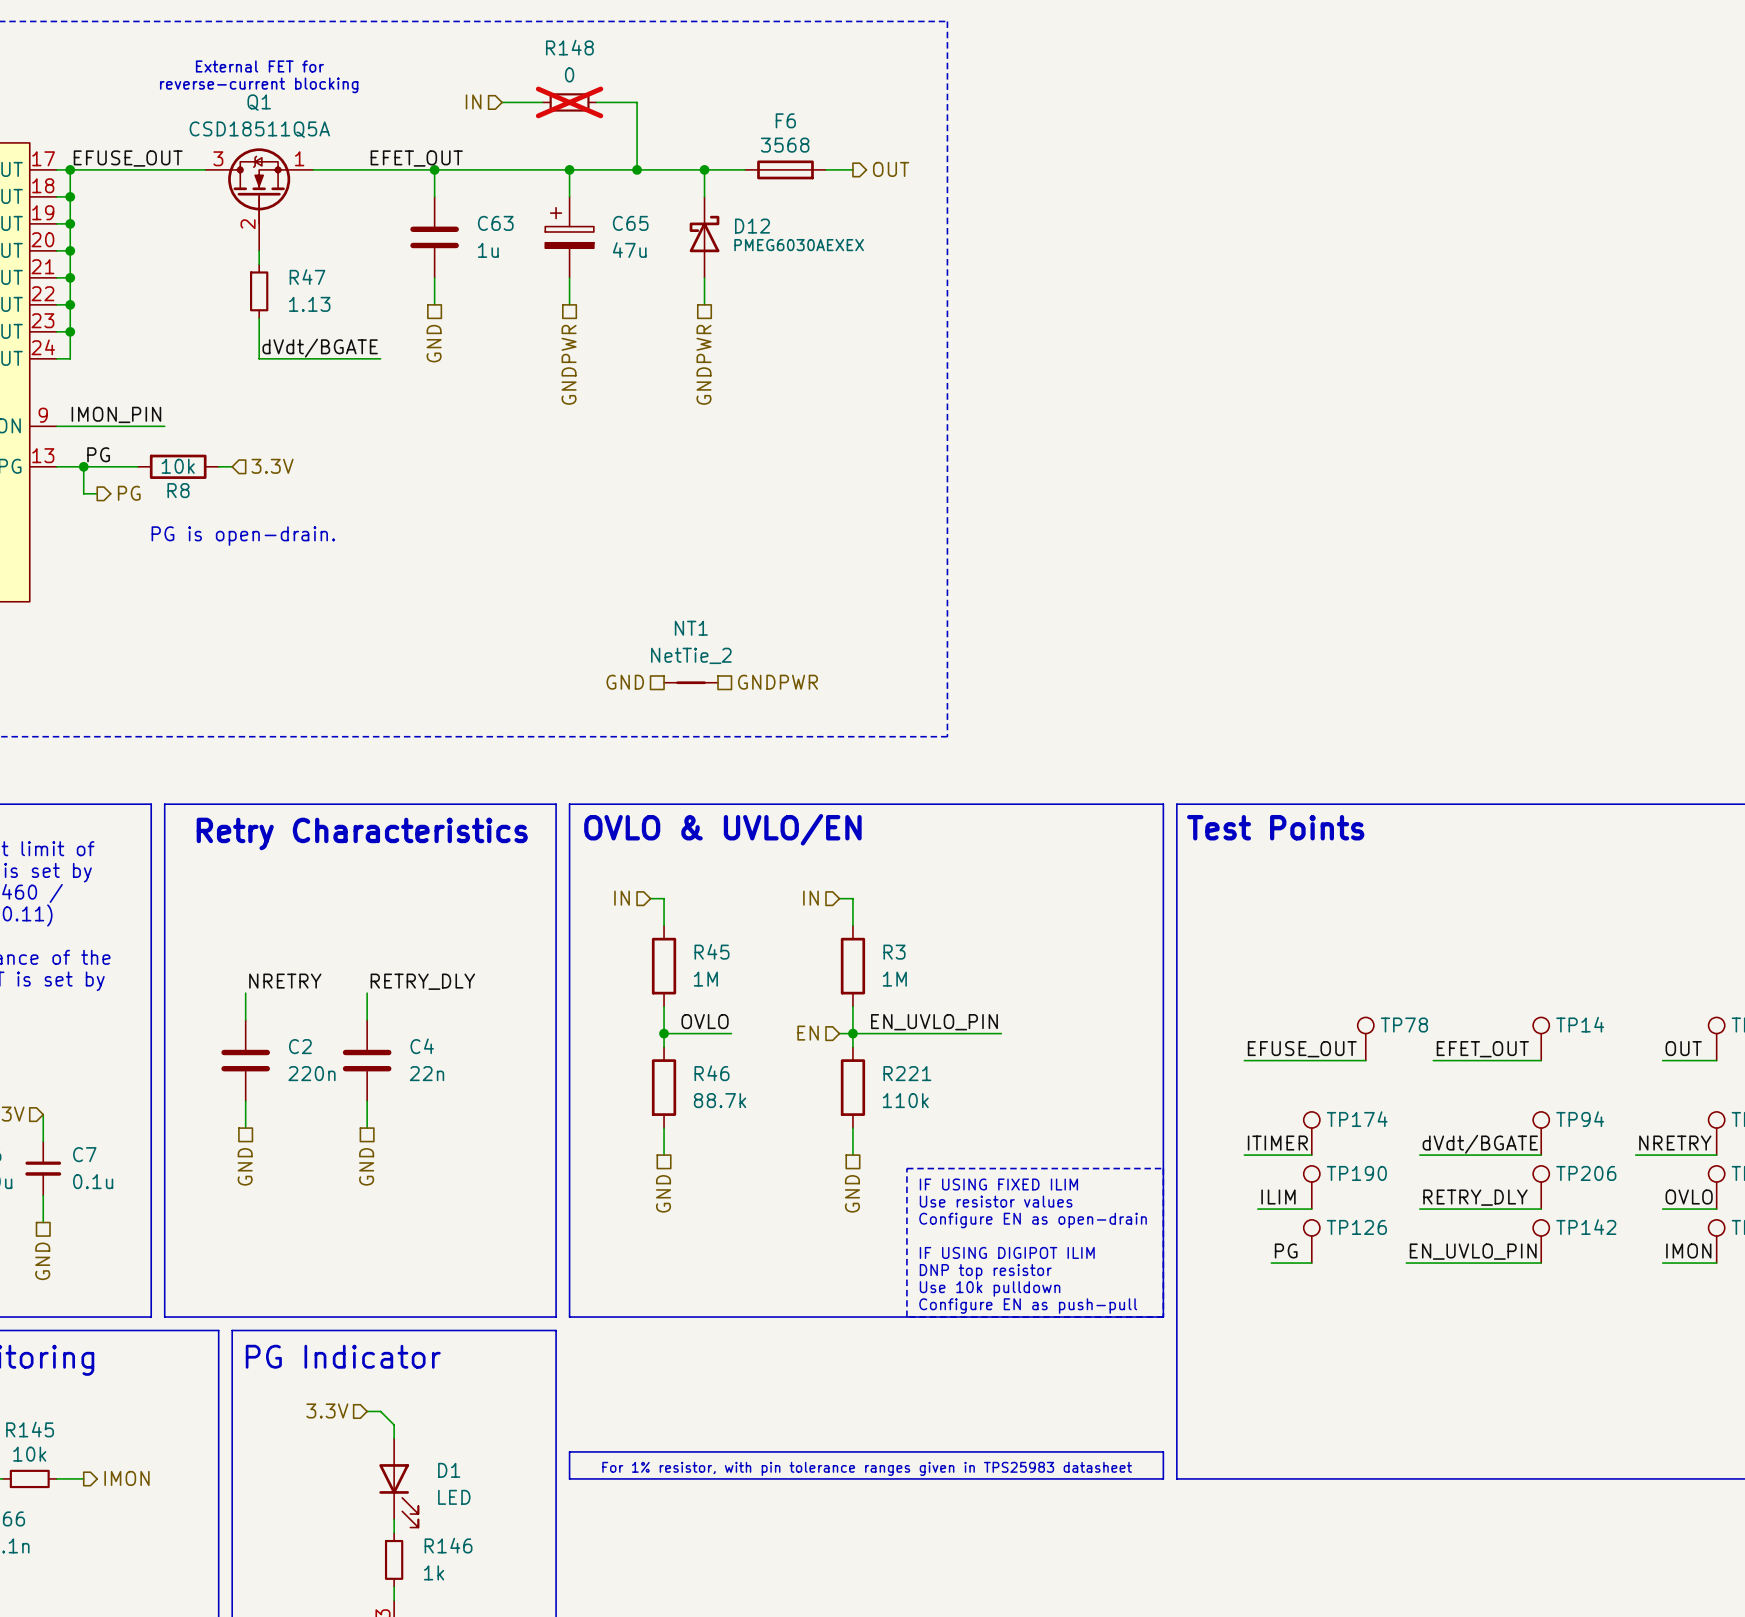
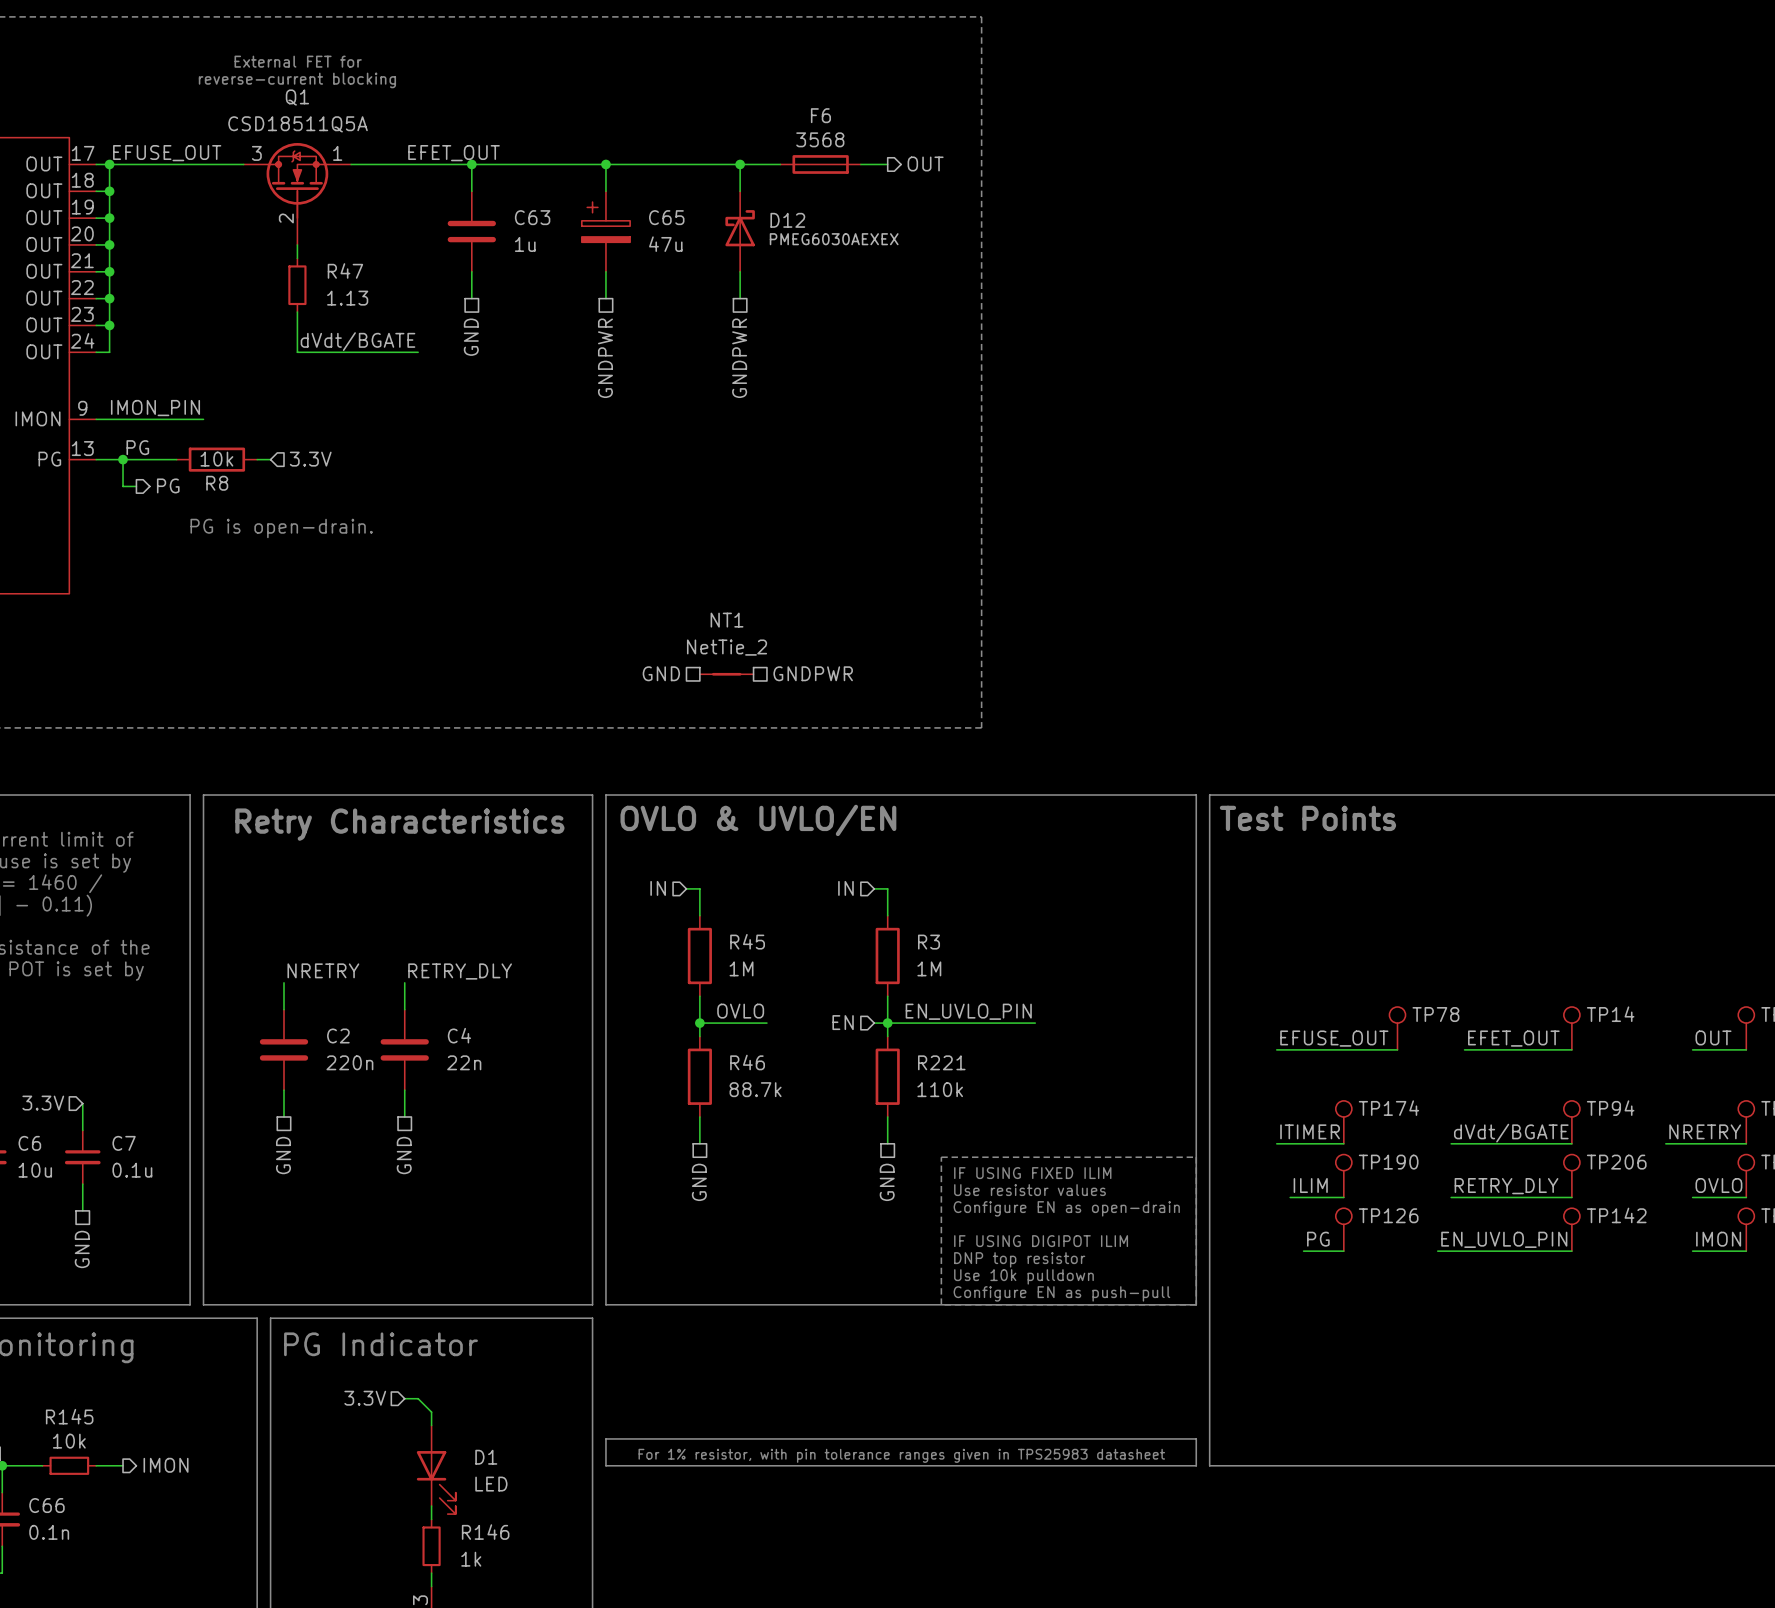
hierarchical label: IN (473, 101) -> none
wire: (502, 102) (542, 102) -> none
R148: 0 (569, 102) -> none
wire: (596, 102) (637, 102) (637, 169) -> none
junction: (637, 169) -> none

